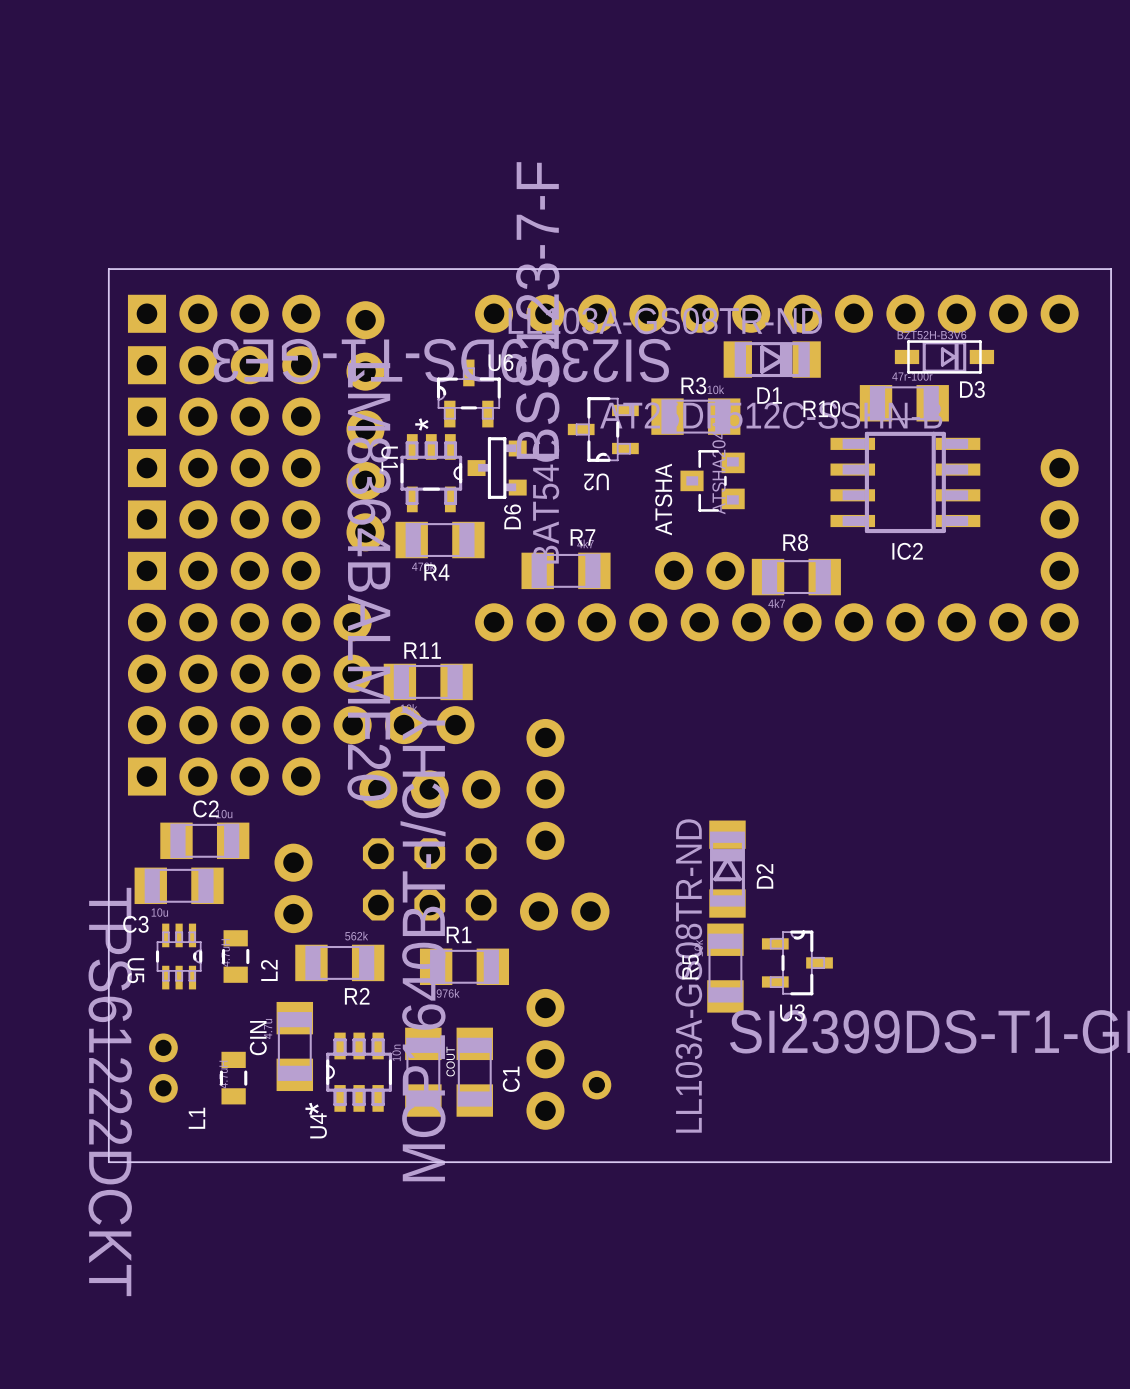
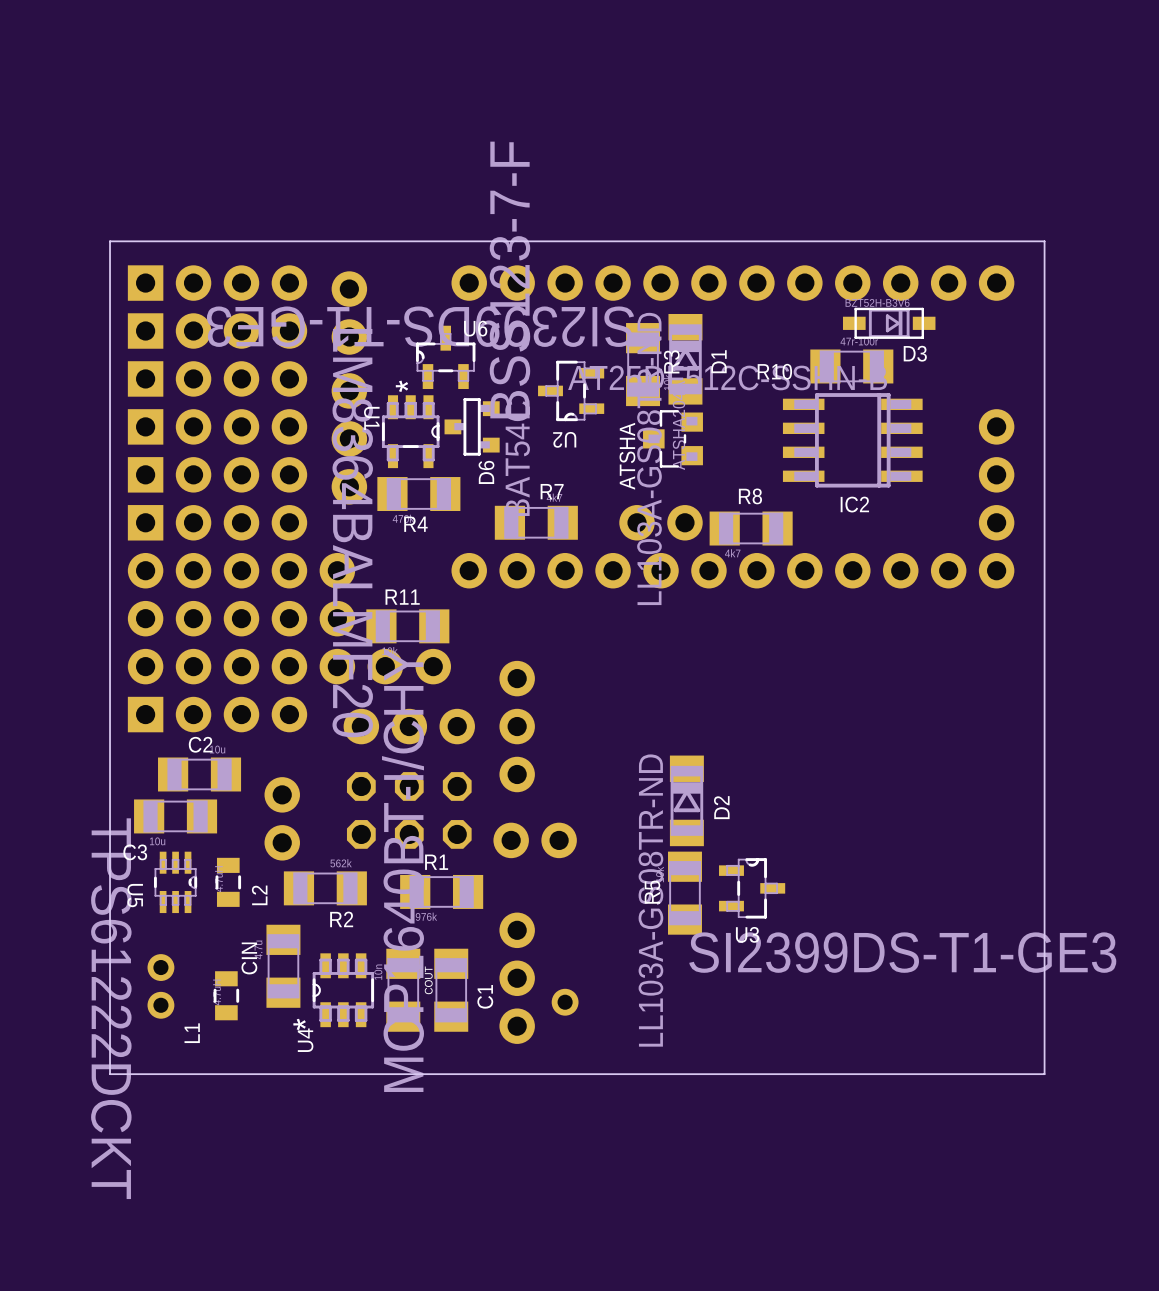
D1 rotation: 0° (772, 359) -> 90° counterclockwise (685, 359)
D1 position: (772, 359) -> (685, 359)
R3 rotation: 0° (695, 416) -> 90° clockwise (643, 364)

